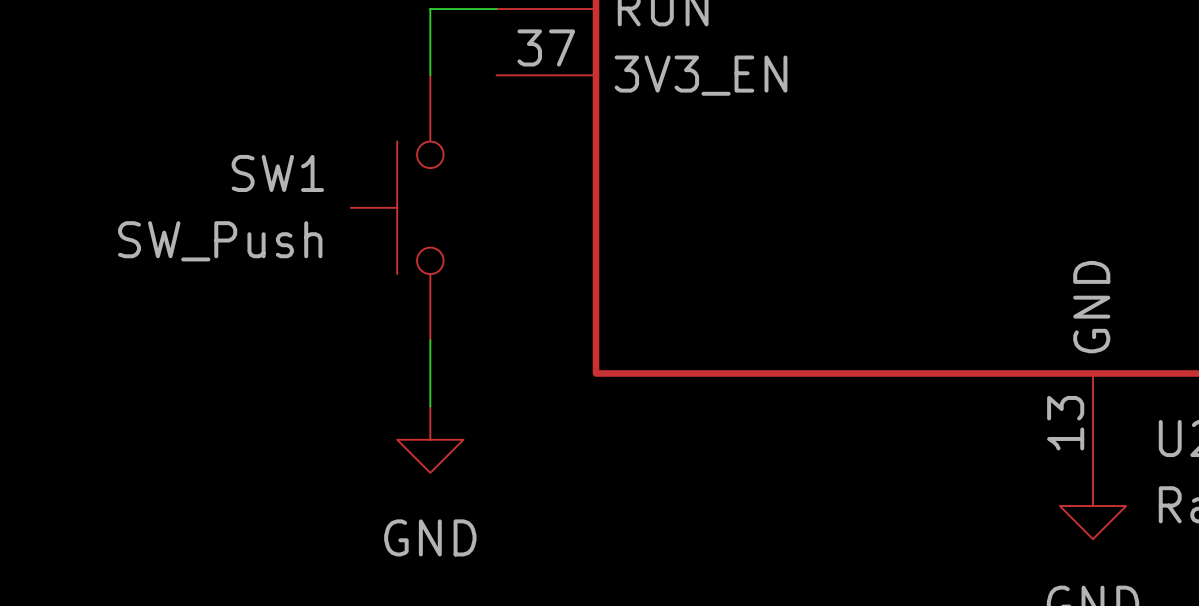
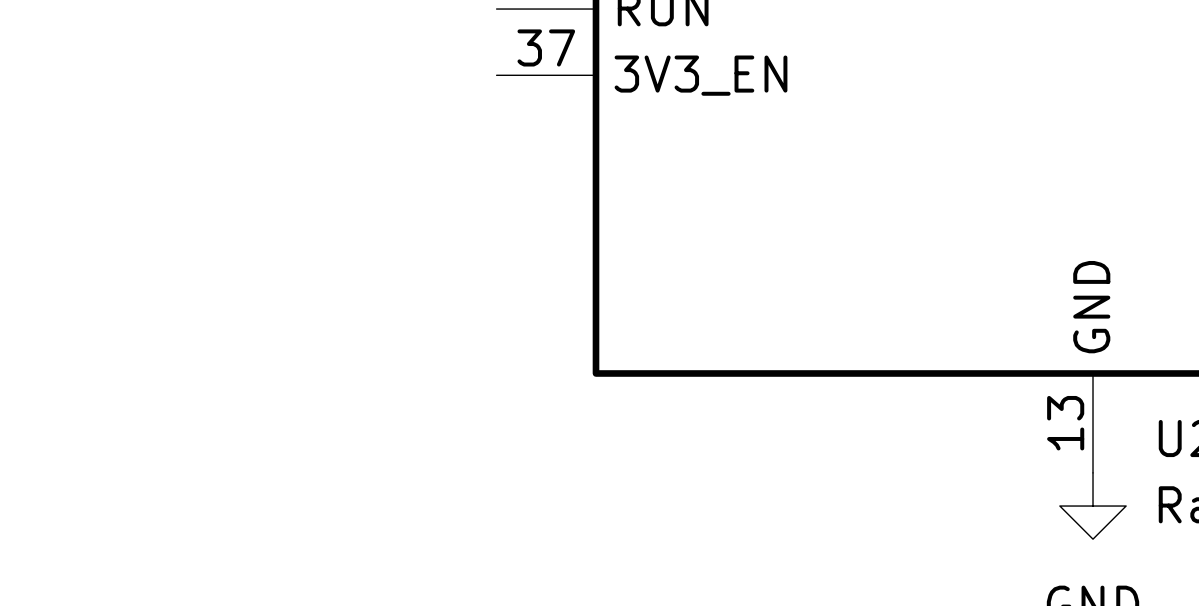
wire: (496, 9) (430, 9) (430, 75) -> none
SW1: SW_Push (397, 207) -> none
wire: (430, 340) (430, 406) -> none
power symbol: GND (430, 439) -> none

